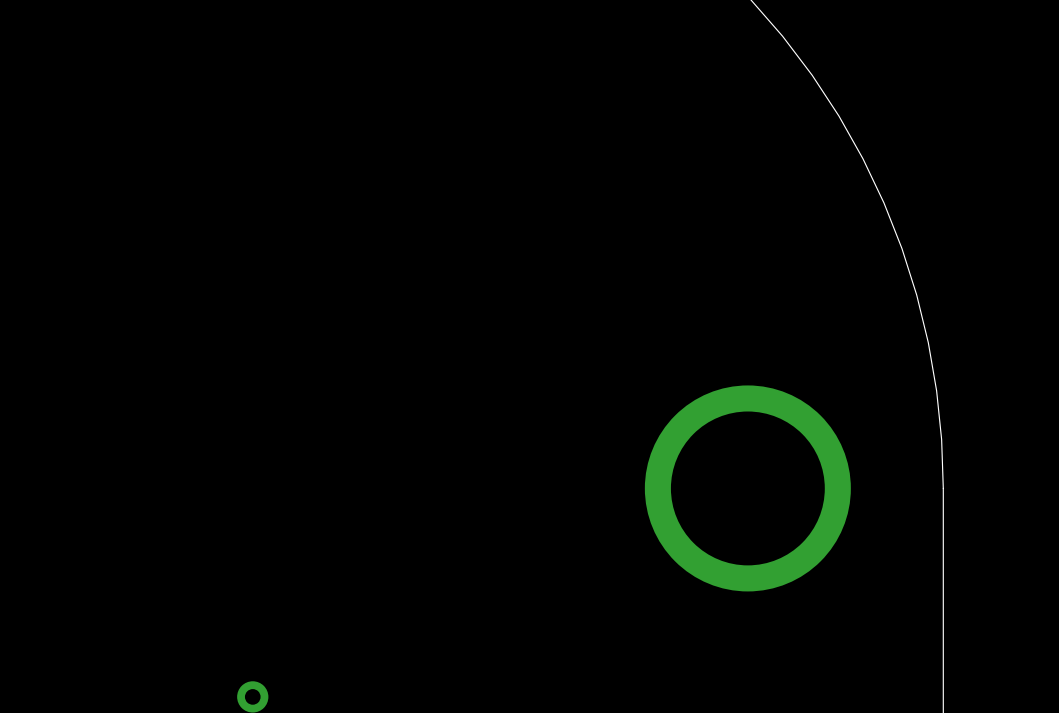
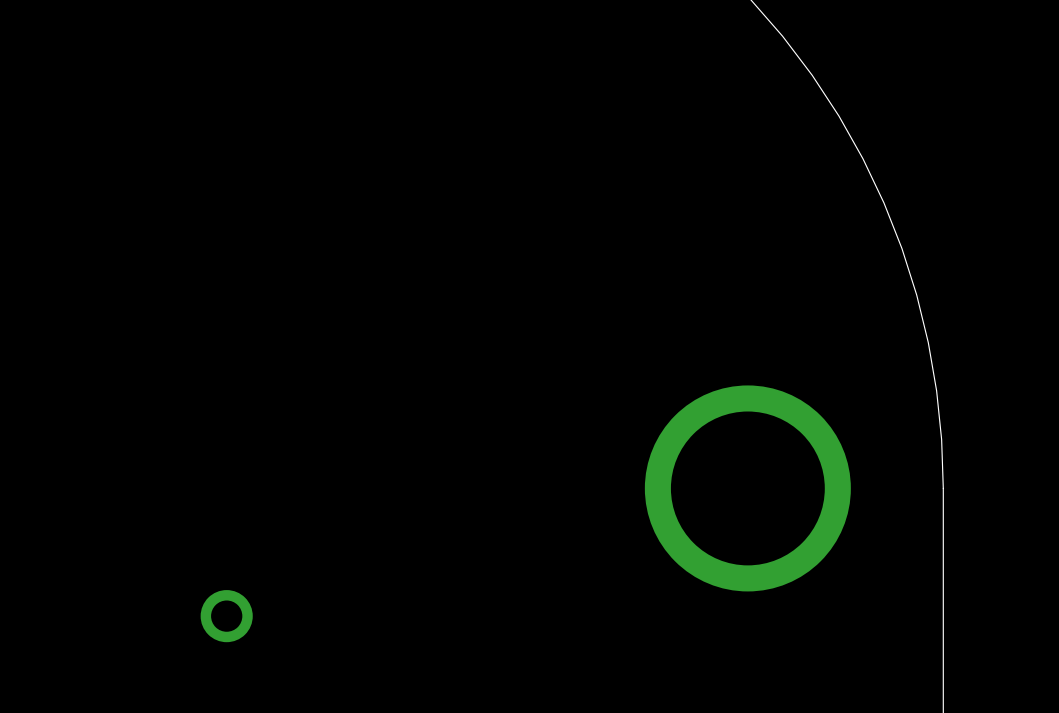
via: none -> (226, 616)
via: (252, 696) -> none

